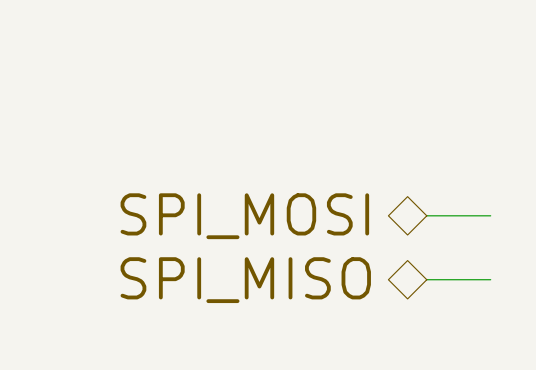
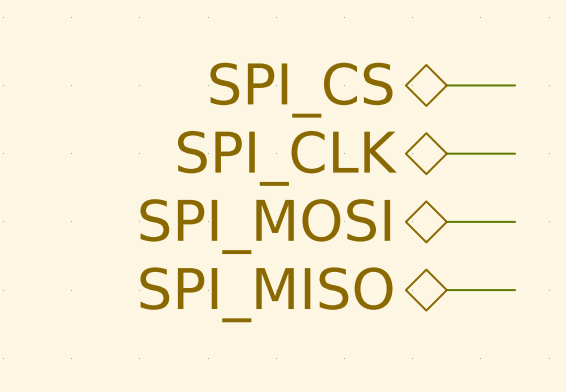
wire: none -> (446, 85) (515, 85)
hierarchical label: none -> SPI_CS (301, 90)
wire: none -> (446, 153) (515, 153)
hierarchical label: none -> SPI_CLK (287, 158)

